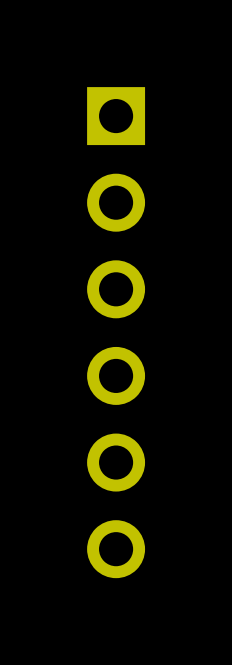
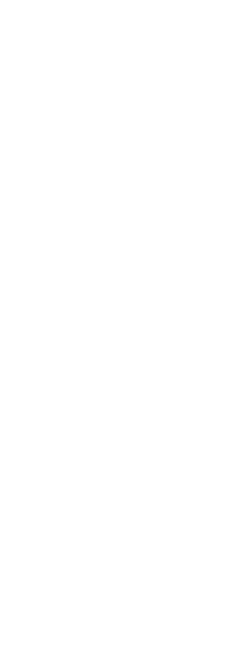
part: (116, 332) -> none

